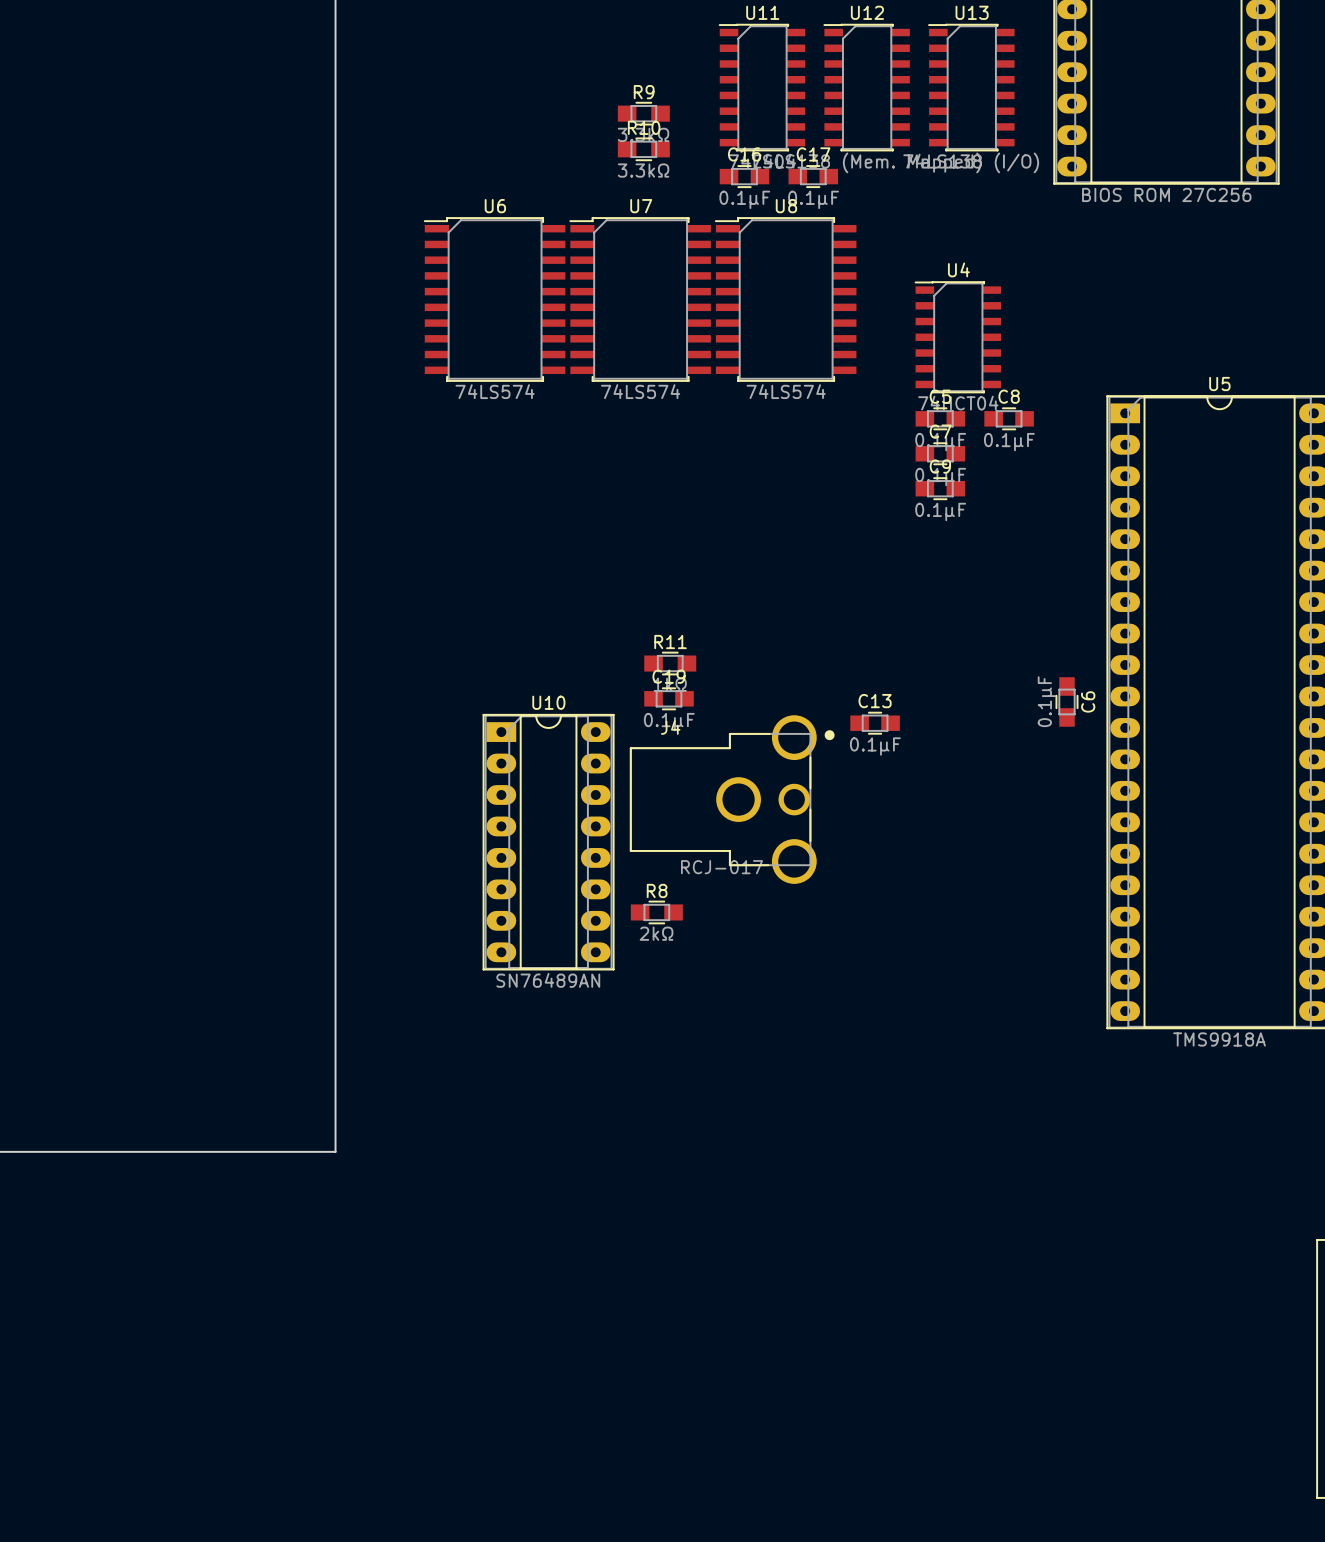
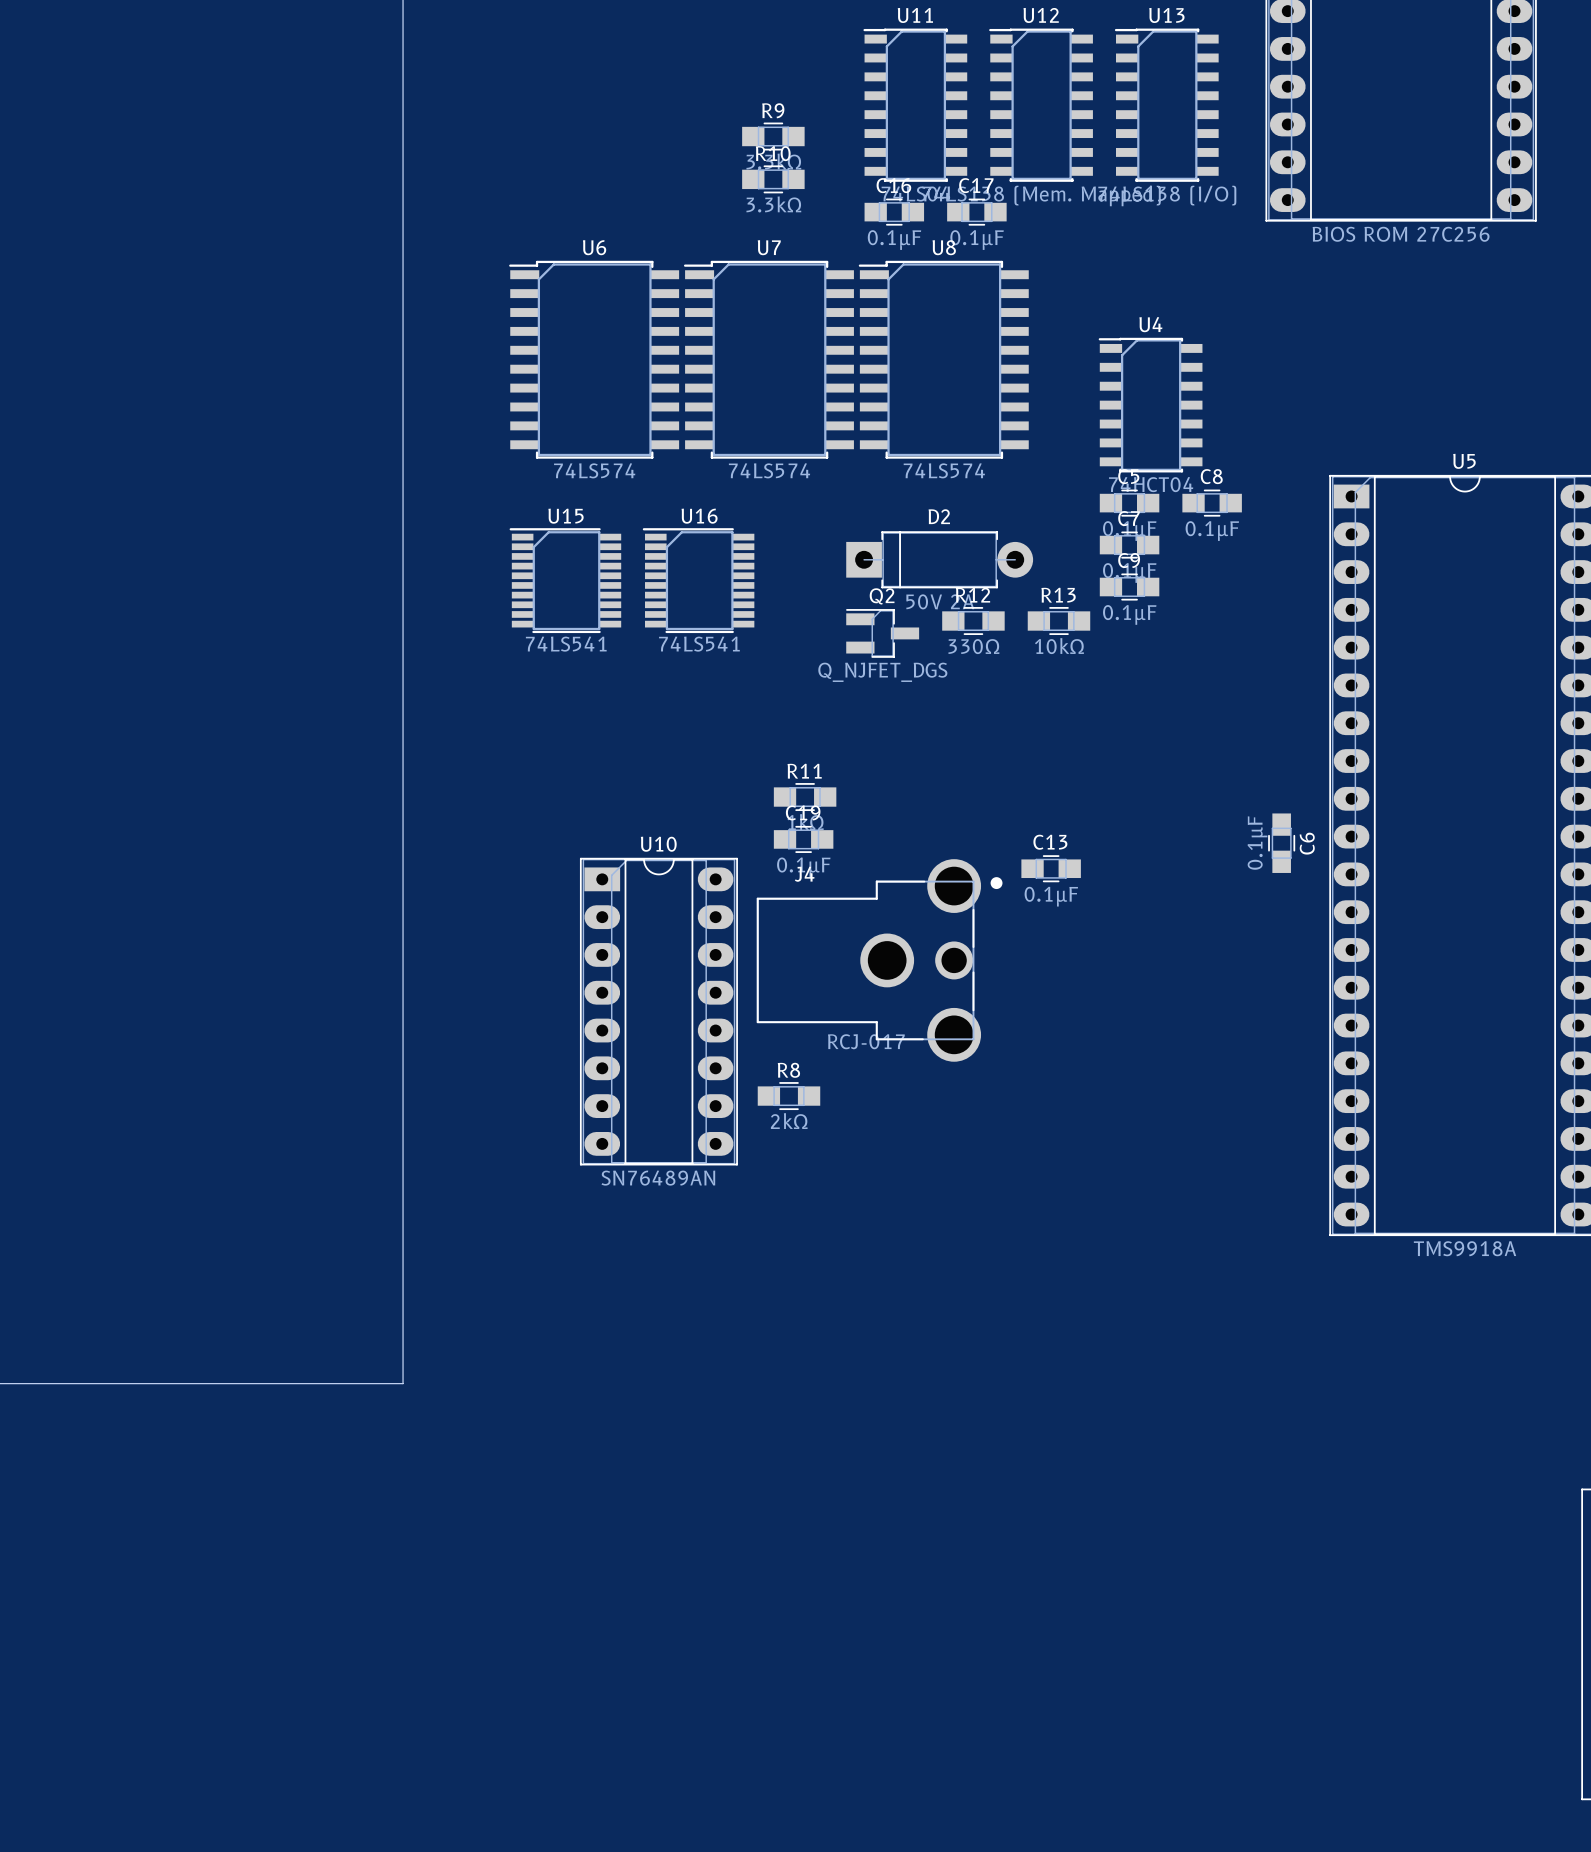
D2: none -> 50V 2A (939, 559)
U15: none -> 74LS541 (565, 580)
U16: none -> 74LS541 (698, 580)
R12: none -> 330Ω (973, 621)
R13: none -> 10kΩ (1058, 621)
Q2: none -> Q_NJFET_DGS (882, 633)

